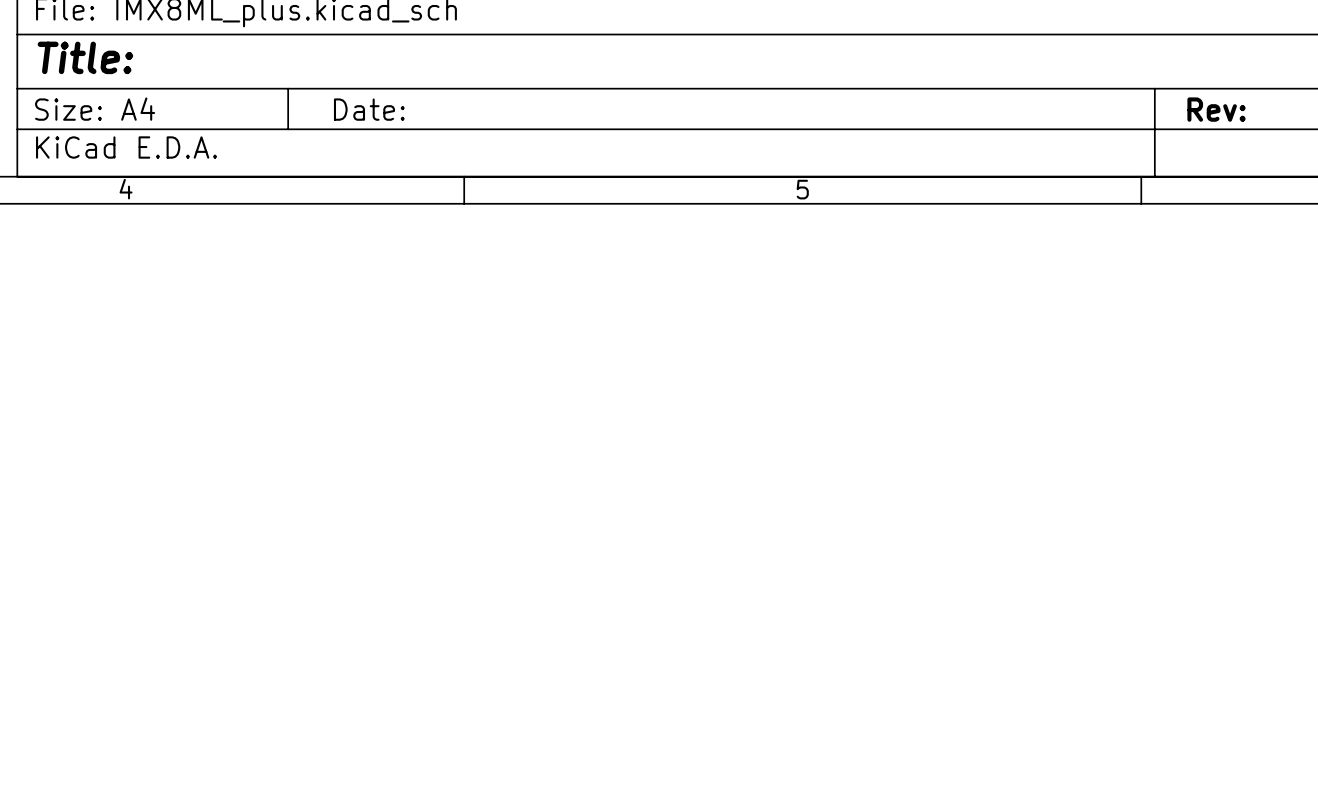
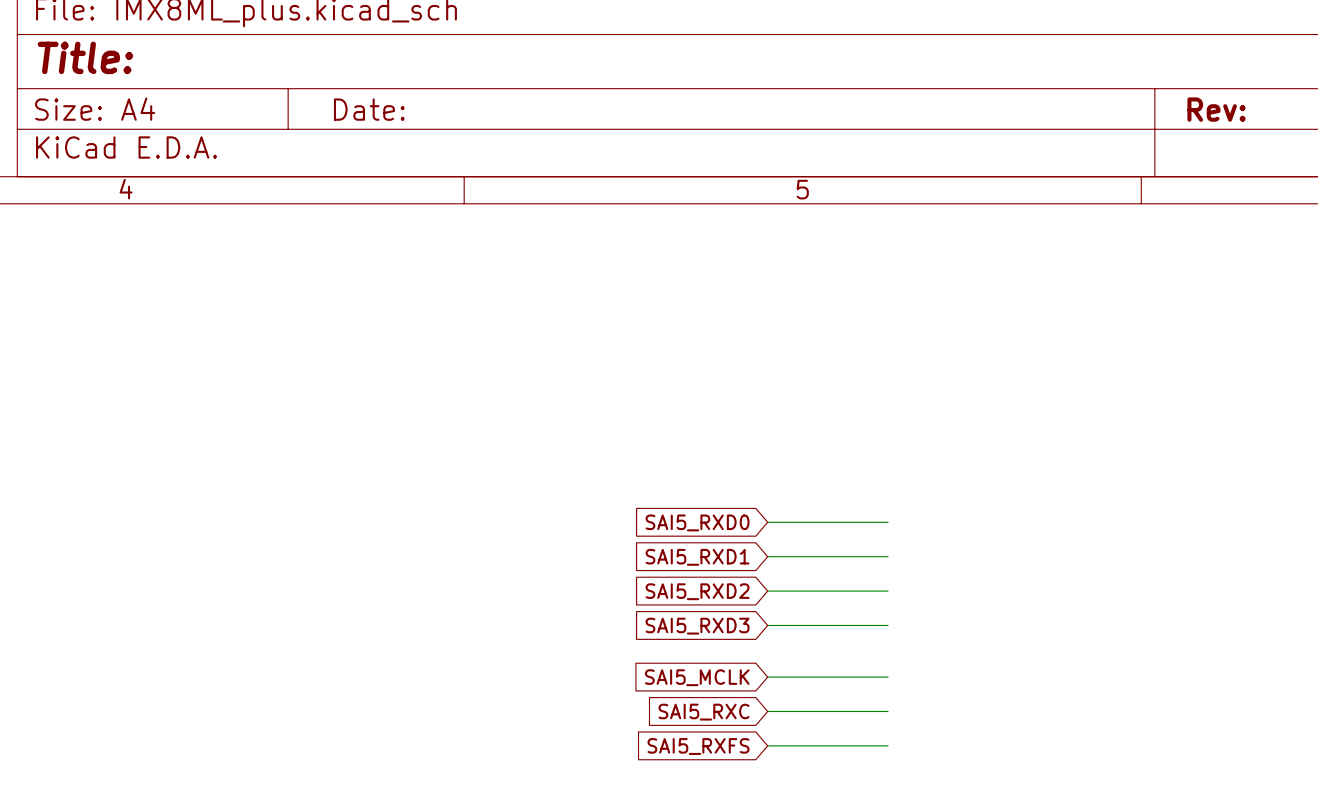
global label: none -> SAI5_RXD0 (697, 522)
wire: none -> (767, 522) (888, 522)
wire: none -> (767, 556) (888, 556)
global label: none -> SAI5_RXD1 (697, 557)
global label: none -> SAI5_RXD2 (697, 591)
wire: none -> (767, 591) (888, 591)
wire: none -> (767, 625) (888, 625)
global label: none -> SAI5_RXD3 (697, 626)
global label: none -> SAI5_MCLK (697, 677)
wire: none -> (767, 677) (888, 677)
wire: none -> (767, 711) (888, 711)
global label: none -> SAI5_RXC (704, 712)
wire: none -> (767, 745) (888, 745)
global label: none -> SAI5_RXFS (698, 746)

